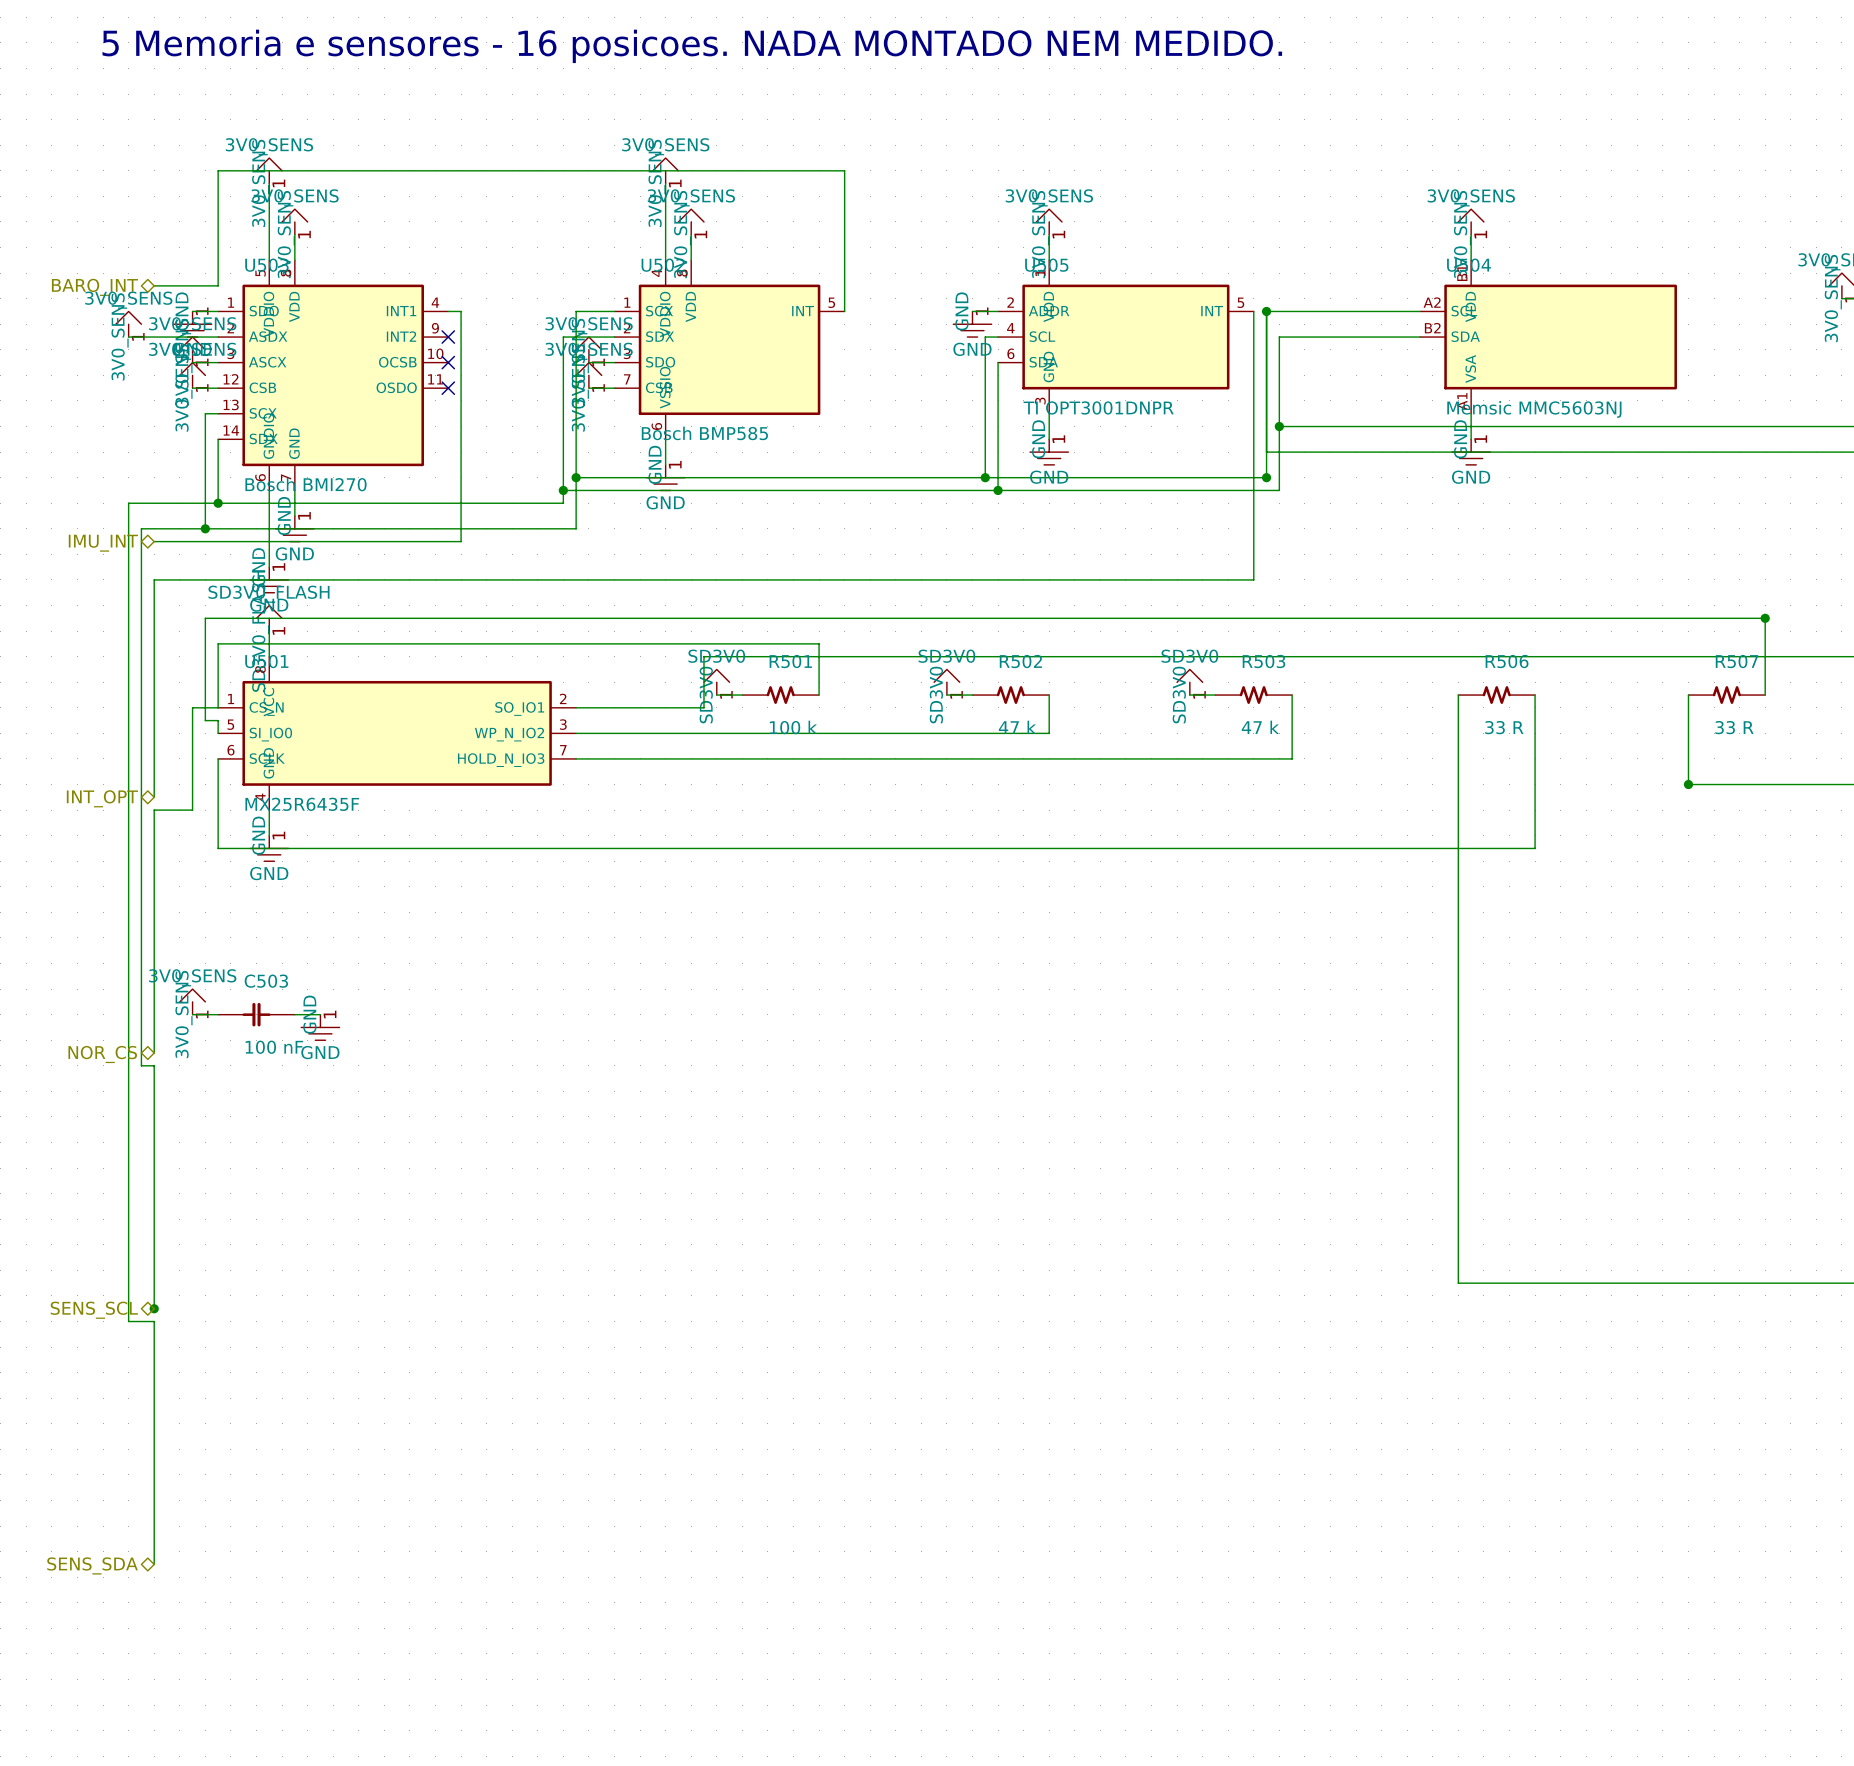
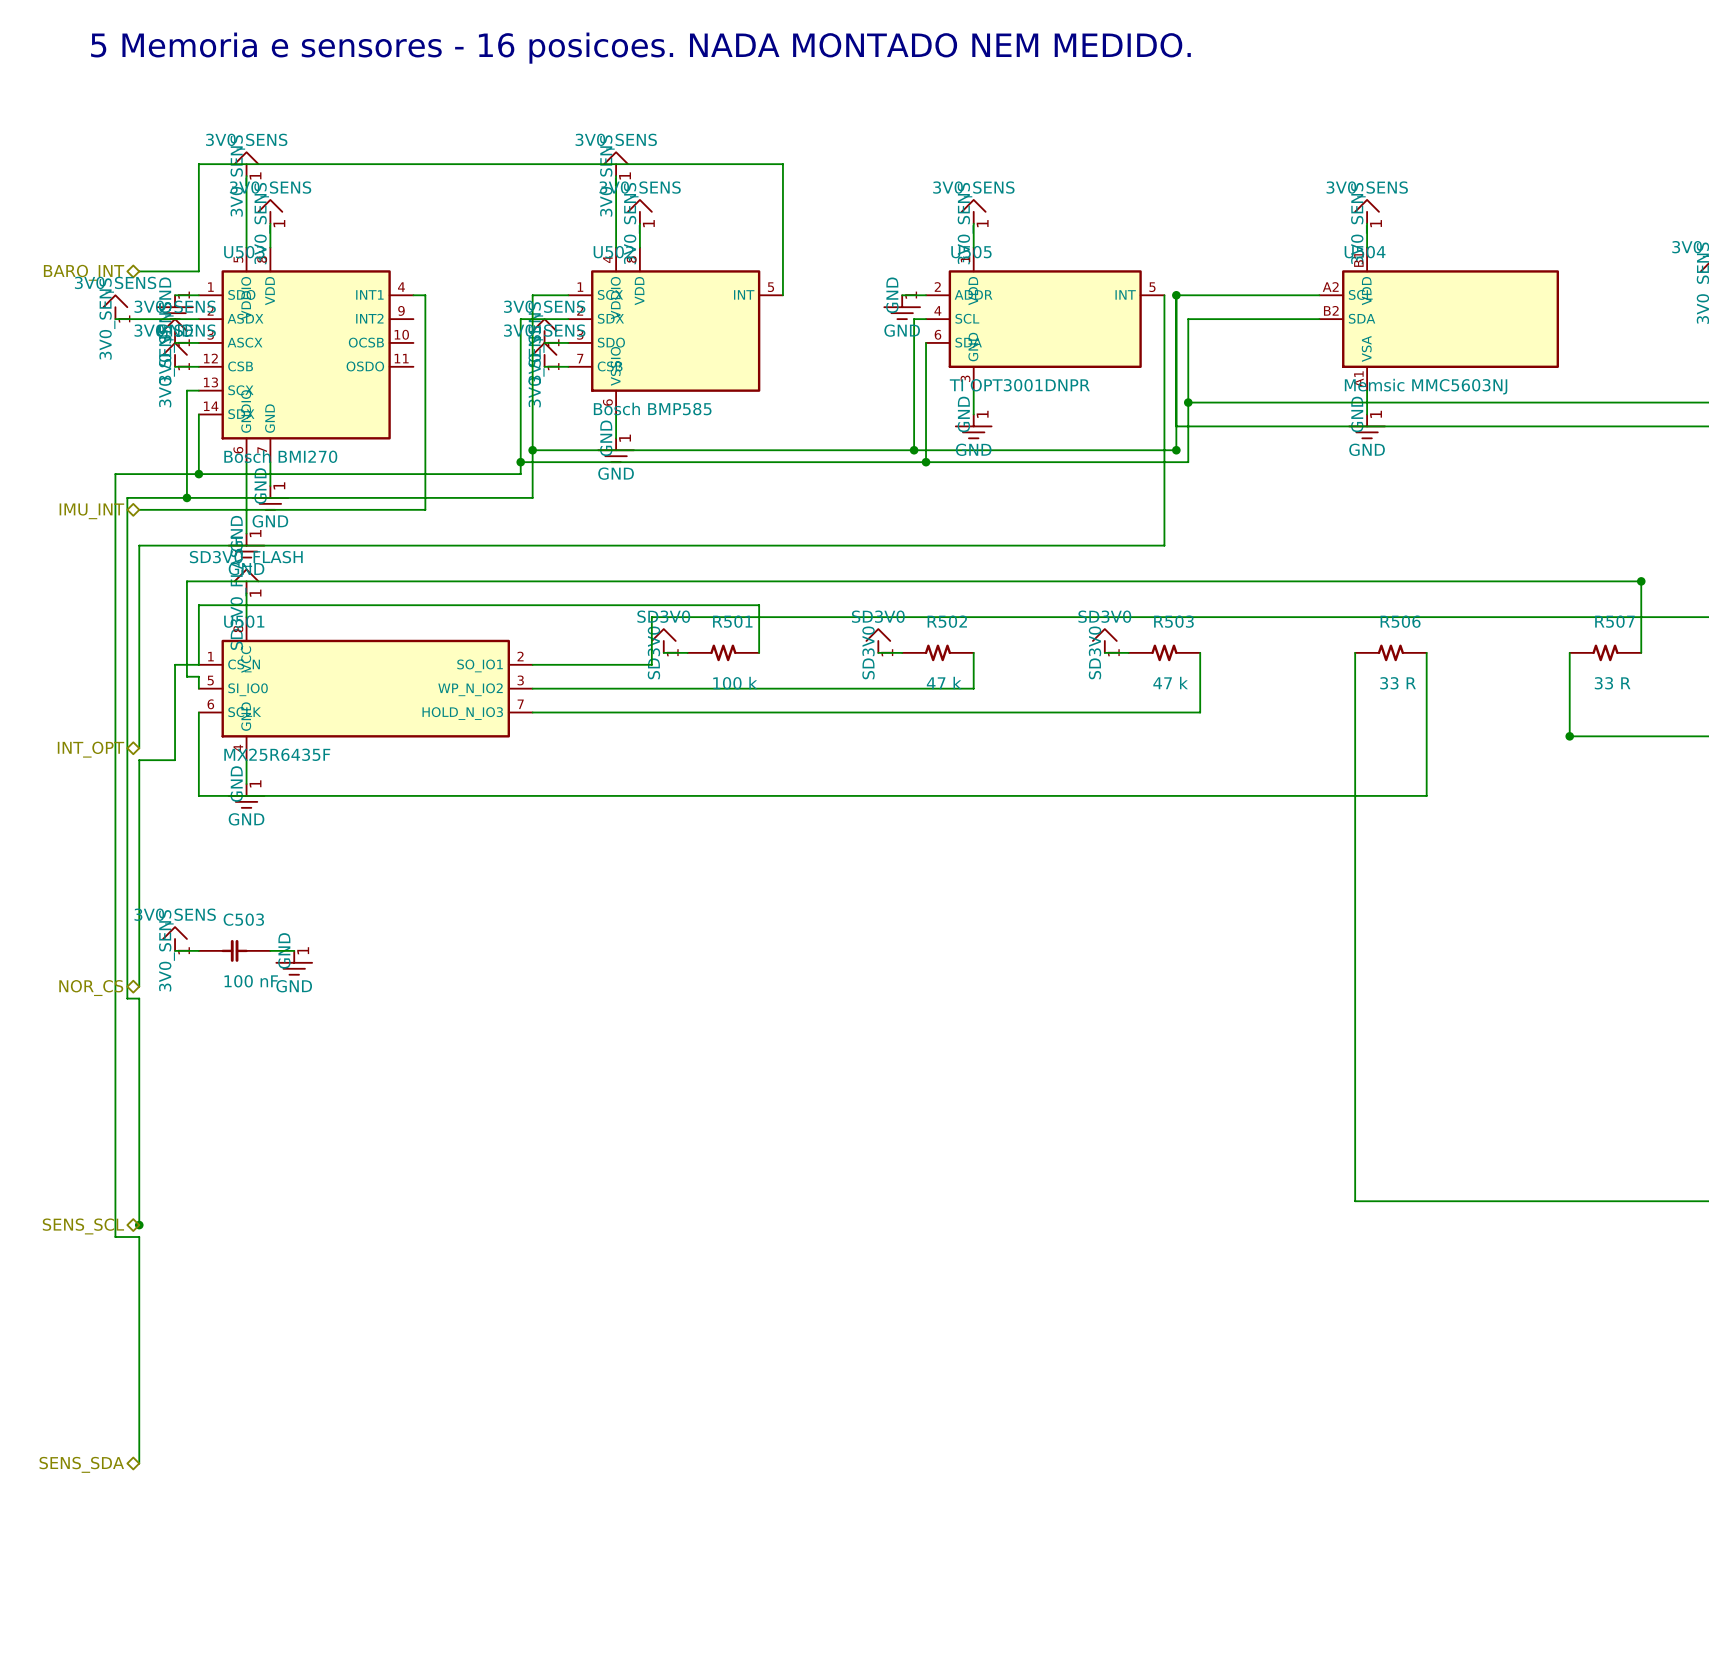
no-connect mark: (448, 337) -> none
no-connect mark: (448, 362) -> none
no-connect mark: (448, 388) -> none

